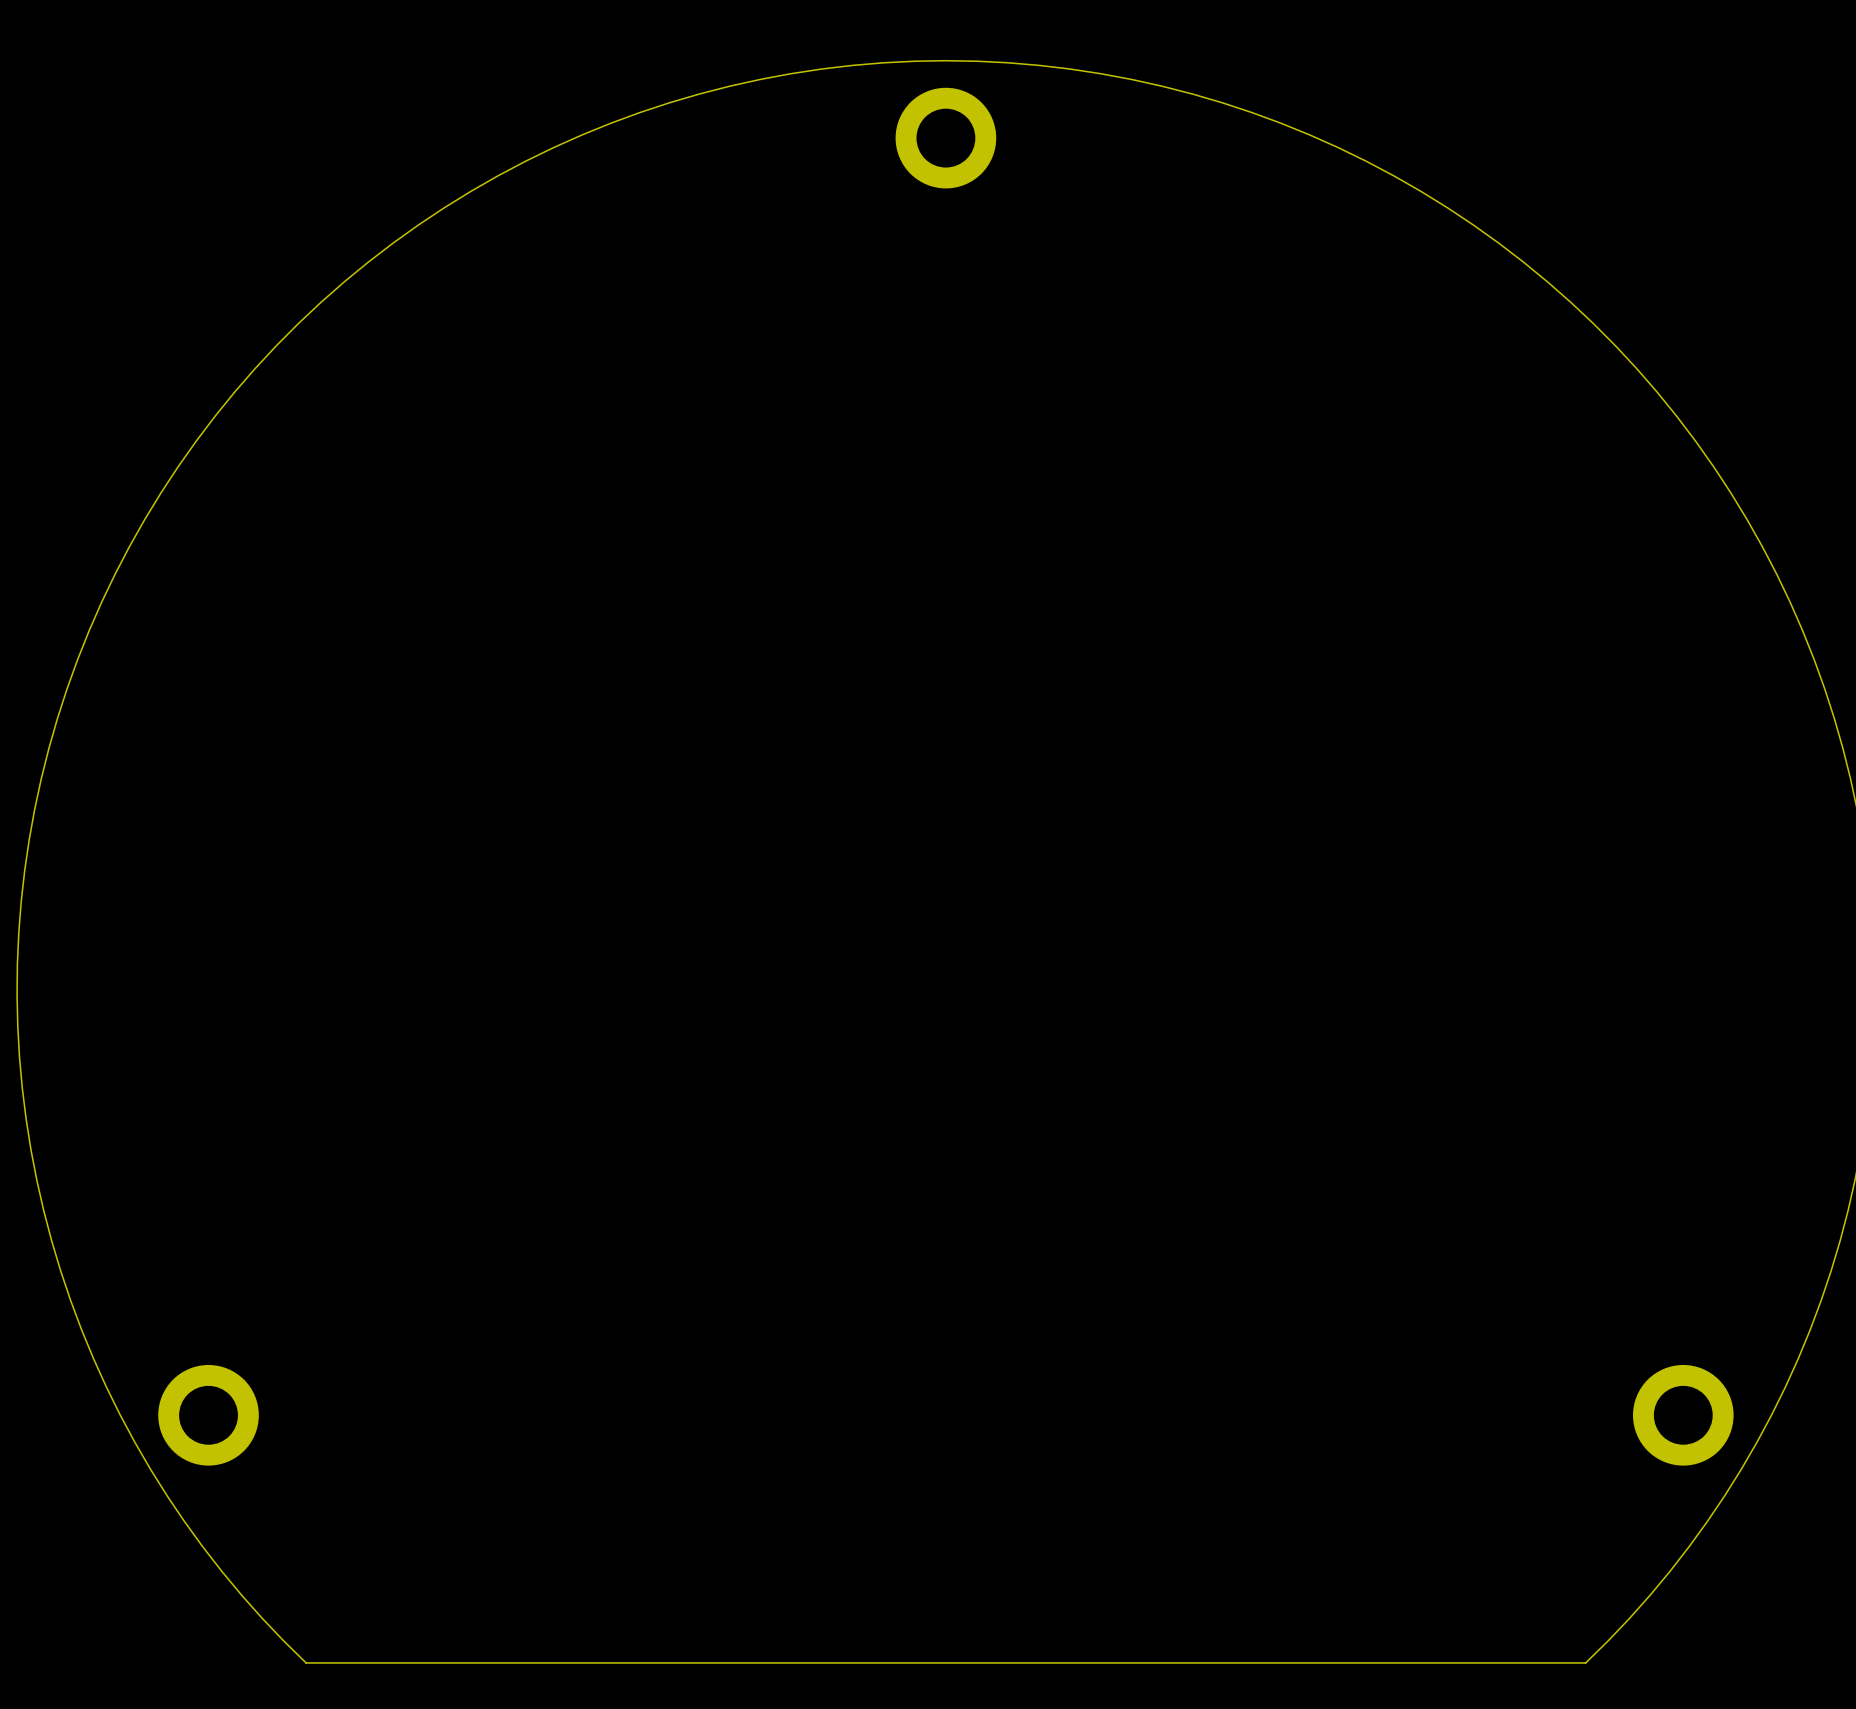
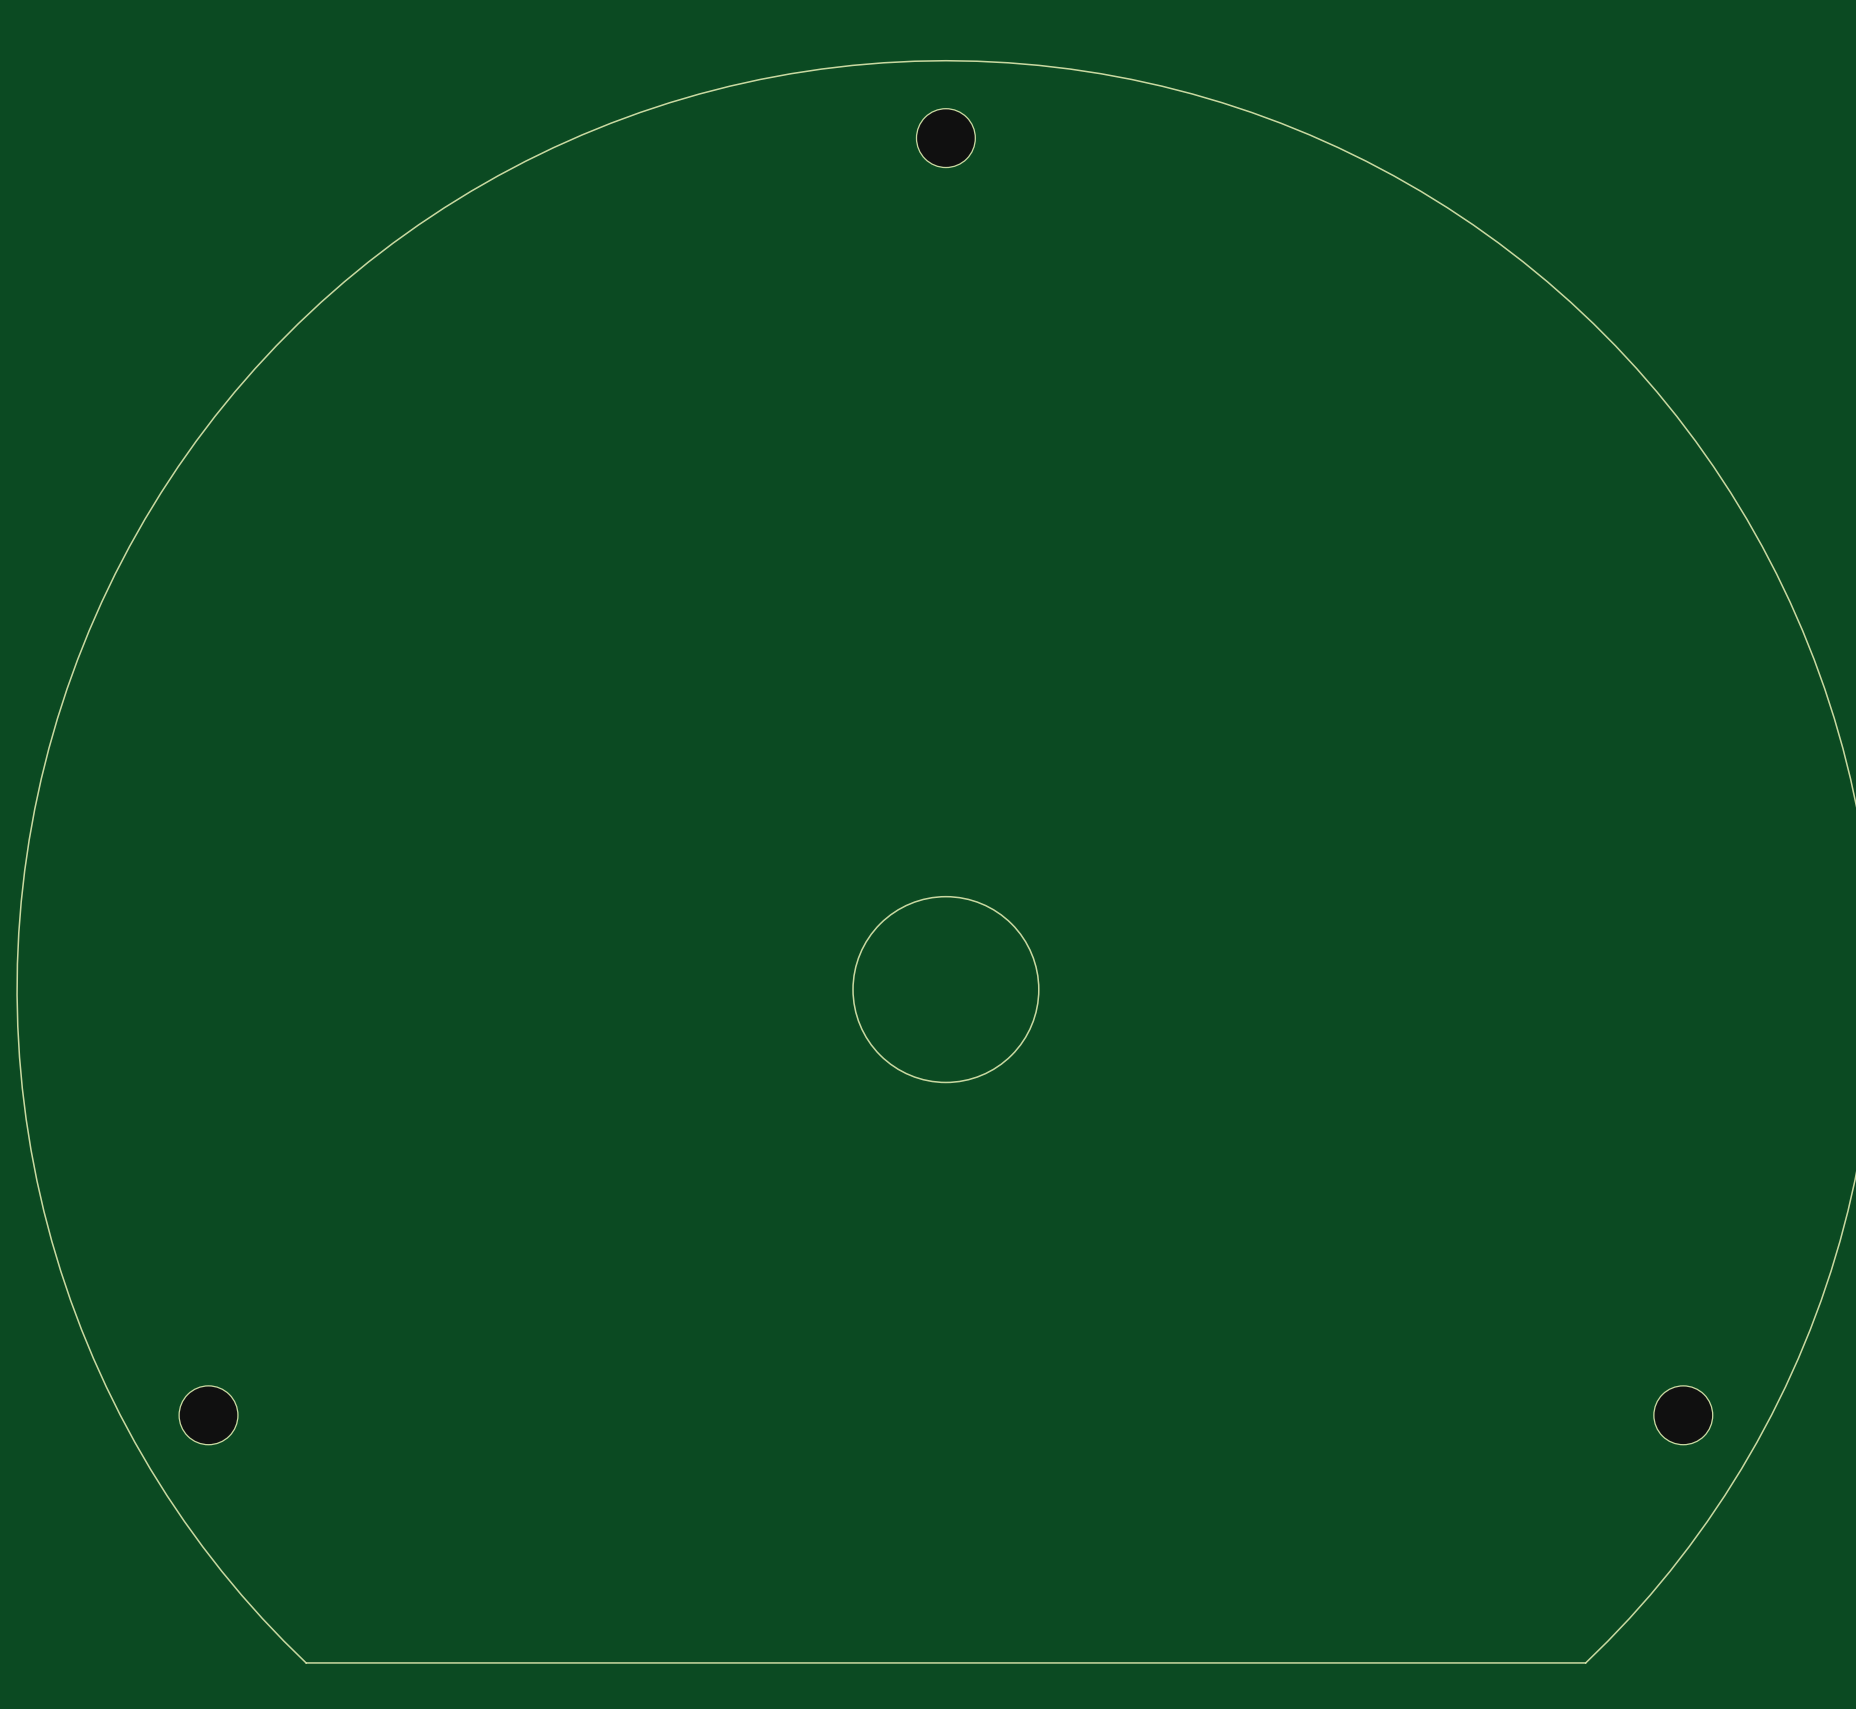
part footprint: [895, 87, 997, 189] -> [916, 108, 976, 168]
round board edge: none -> [852, 895, 1040, 1084]
part footprint: [158, 1364, 259, 1466] -> [179, 1385, 238, 1445]
part footprint: [1632, 1364, 1734, 1466] -> [1653, 1385, 1713, 1445]

